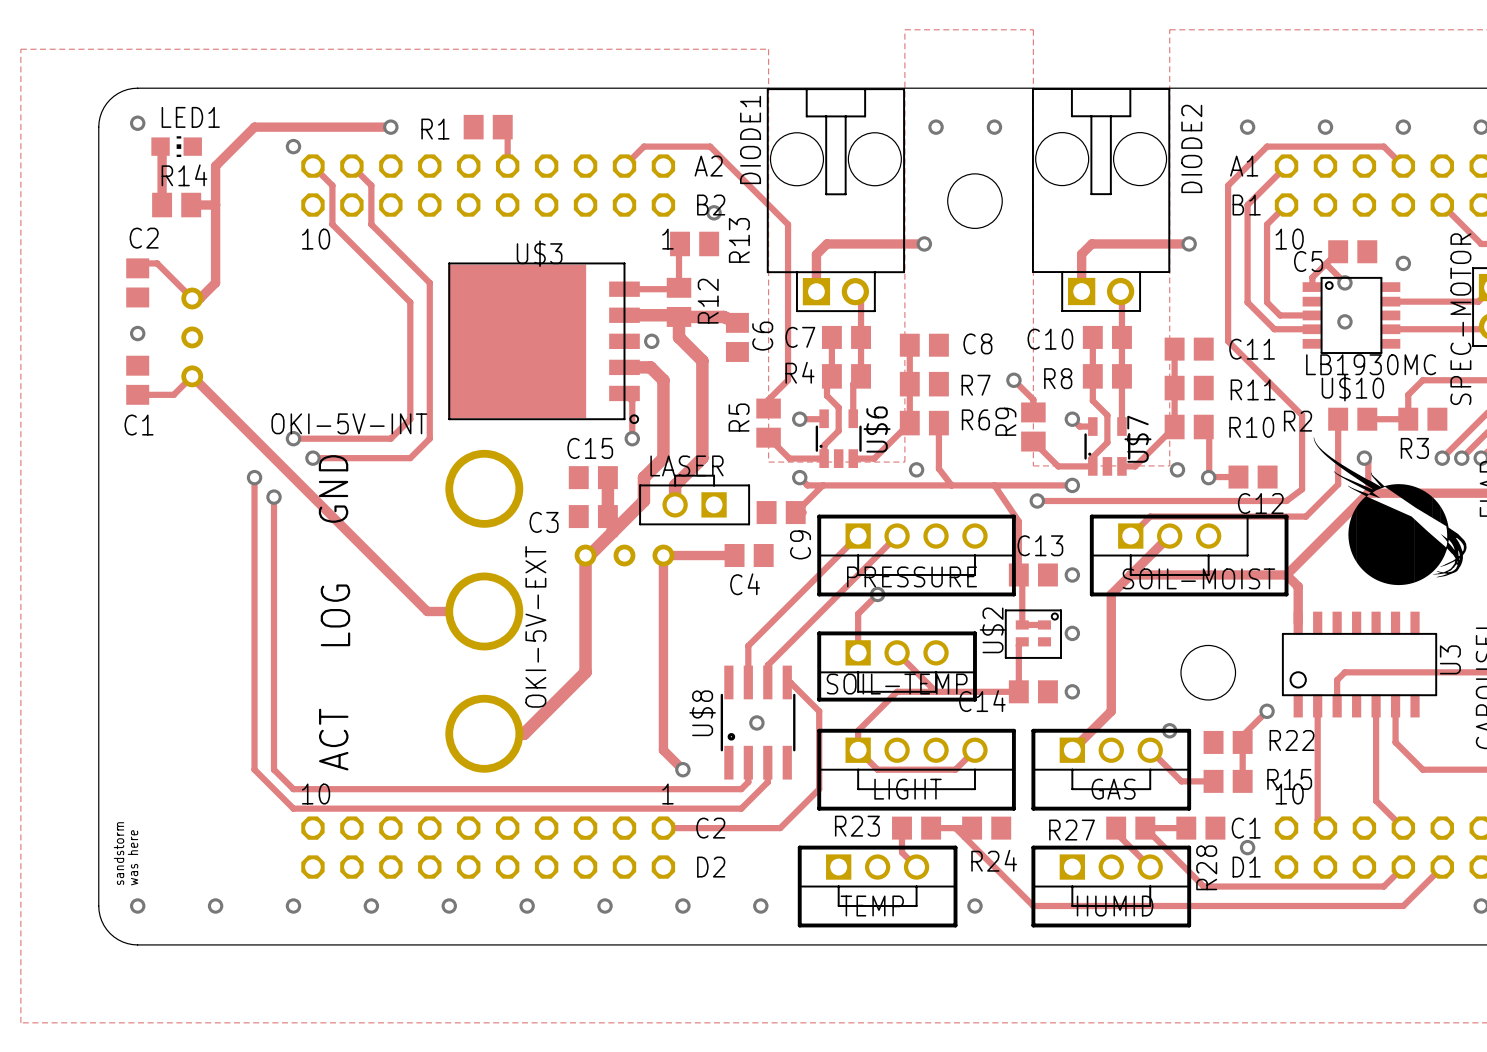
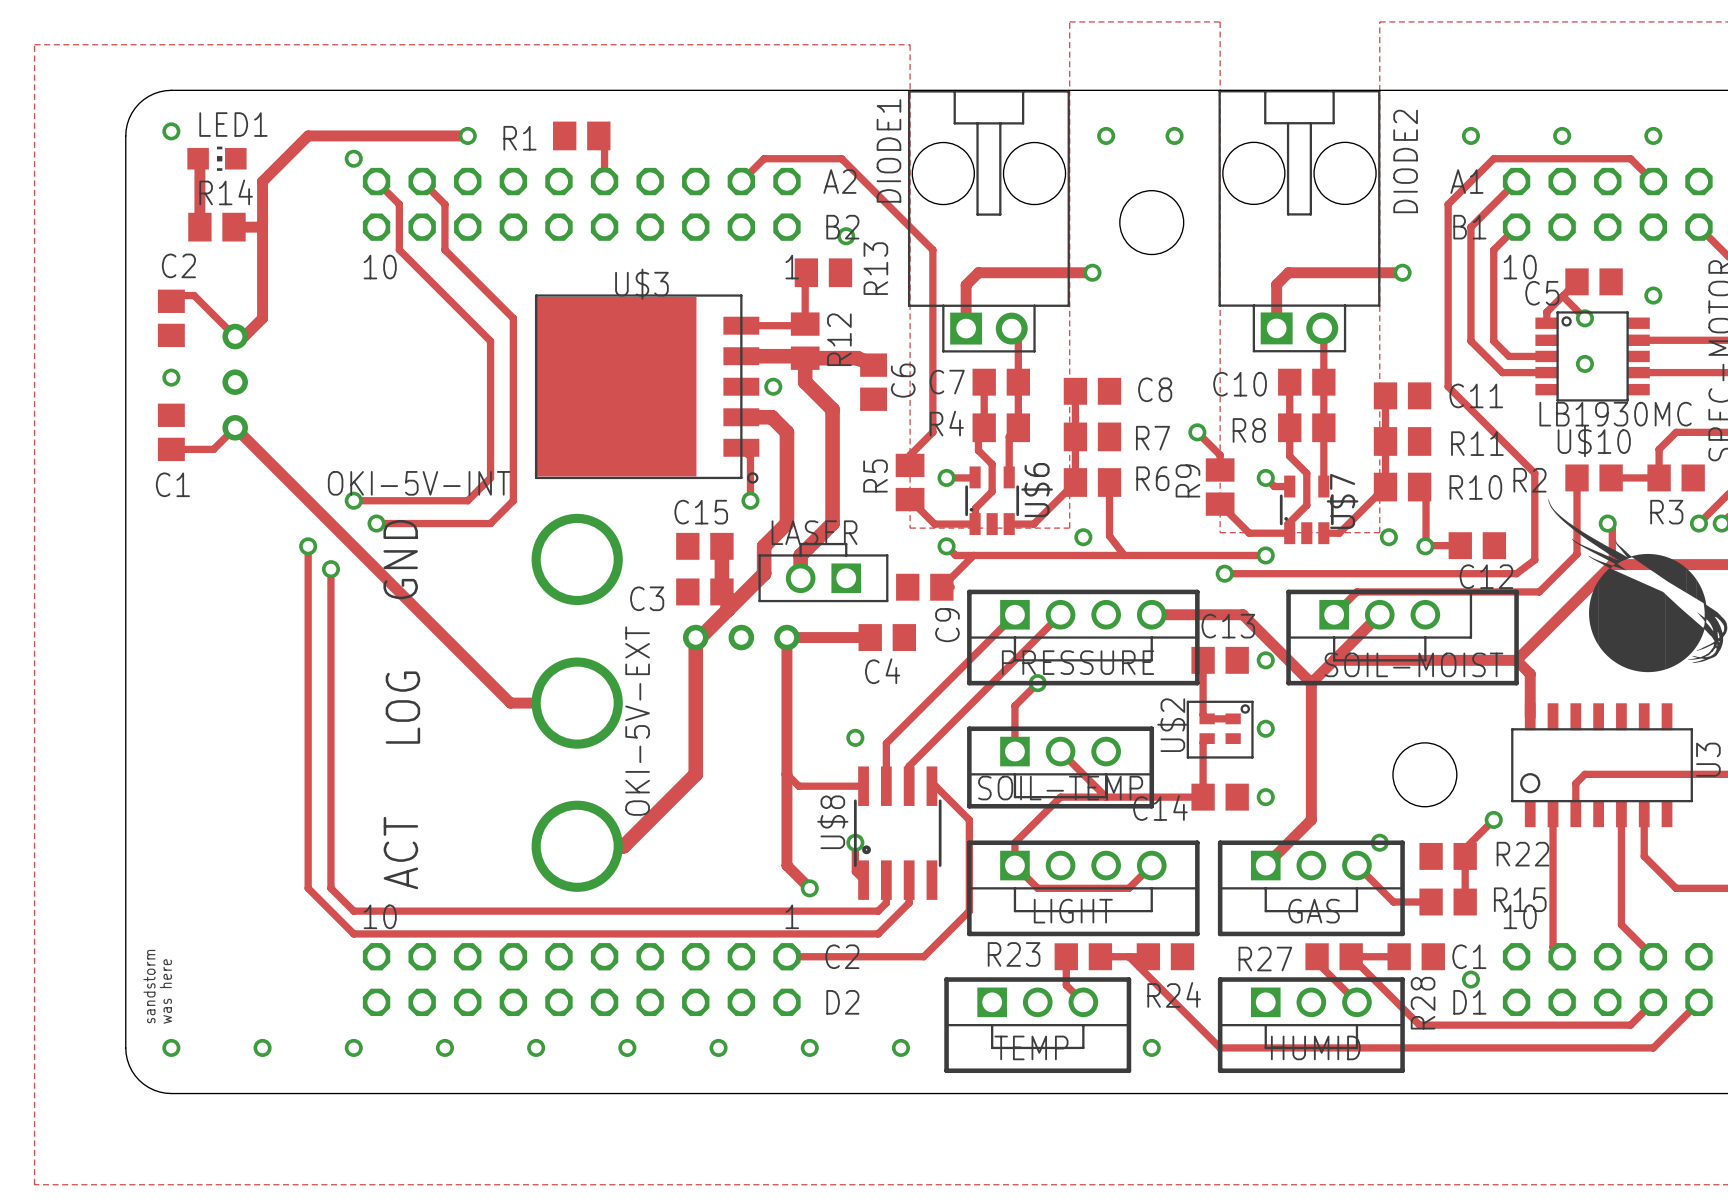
track: (994, 485) (1018, 521) (1018, 574) (1022, 578) (1022, 624) -> (1203, 660) (1203, 714) (1207, 718)
track: none -> (1151, 614) (1242, 614) (1311, 683)
via: none -> (855, 737)
track: none -> (786, 774) (798, 786) (863, 786)
via position: (756, 722) -> (855, 842)
track: none -> (855, 842) (855, 871) (863, 880)

